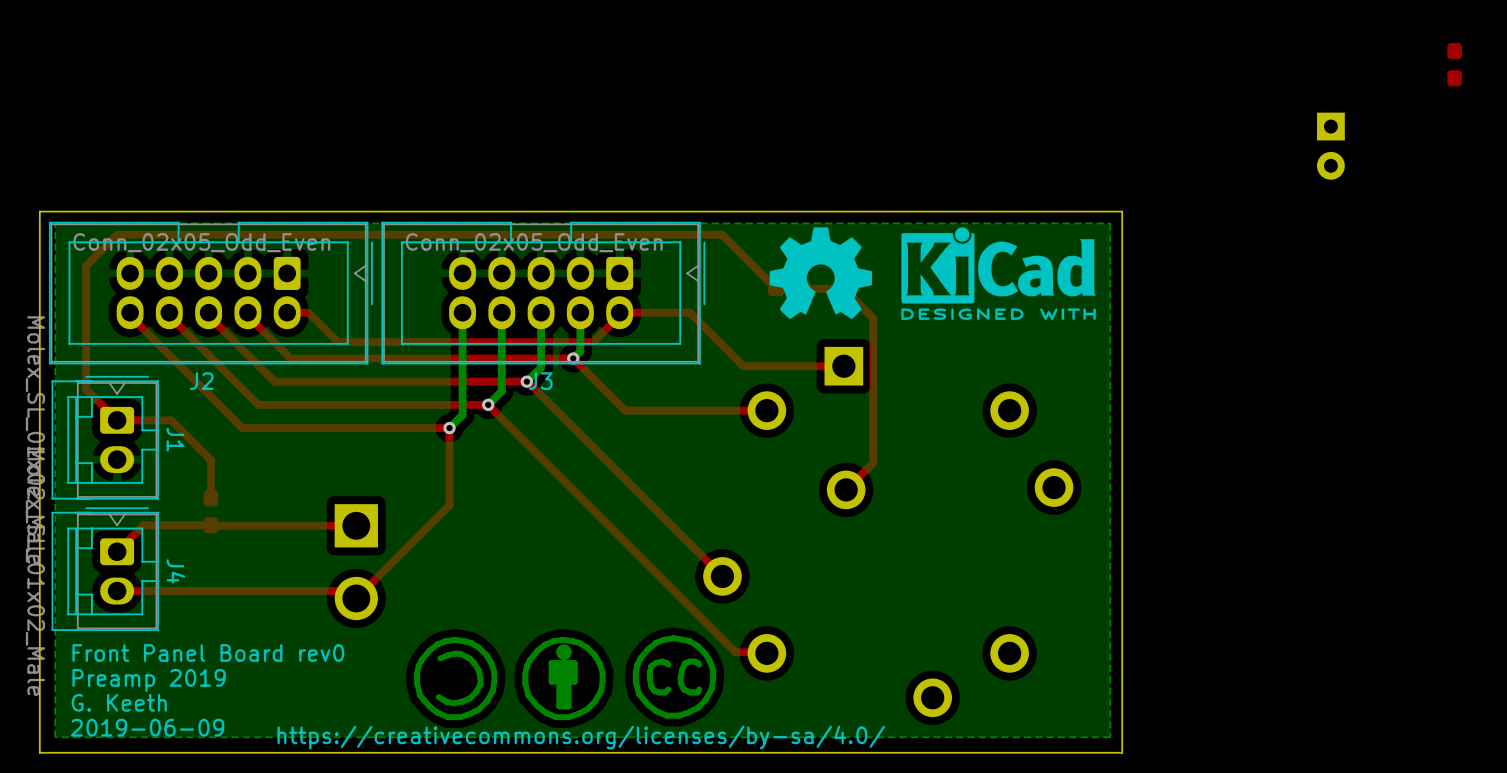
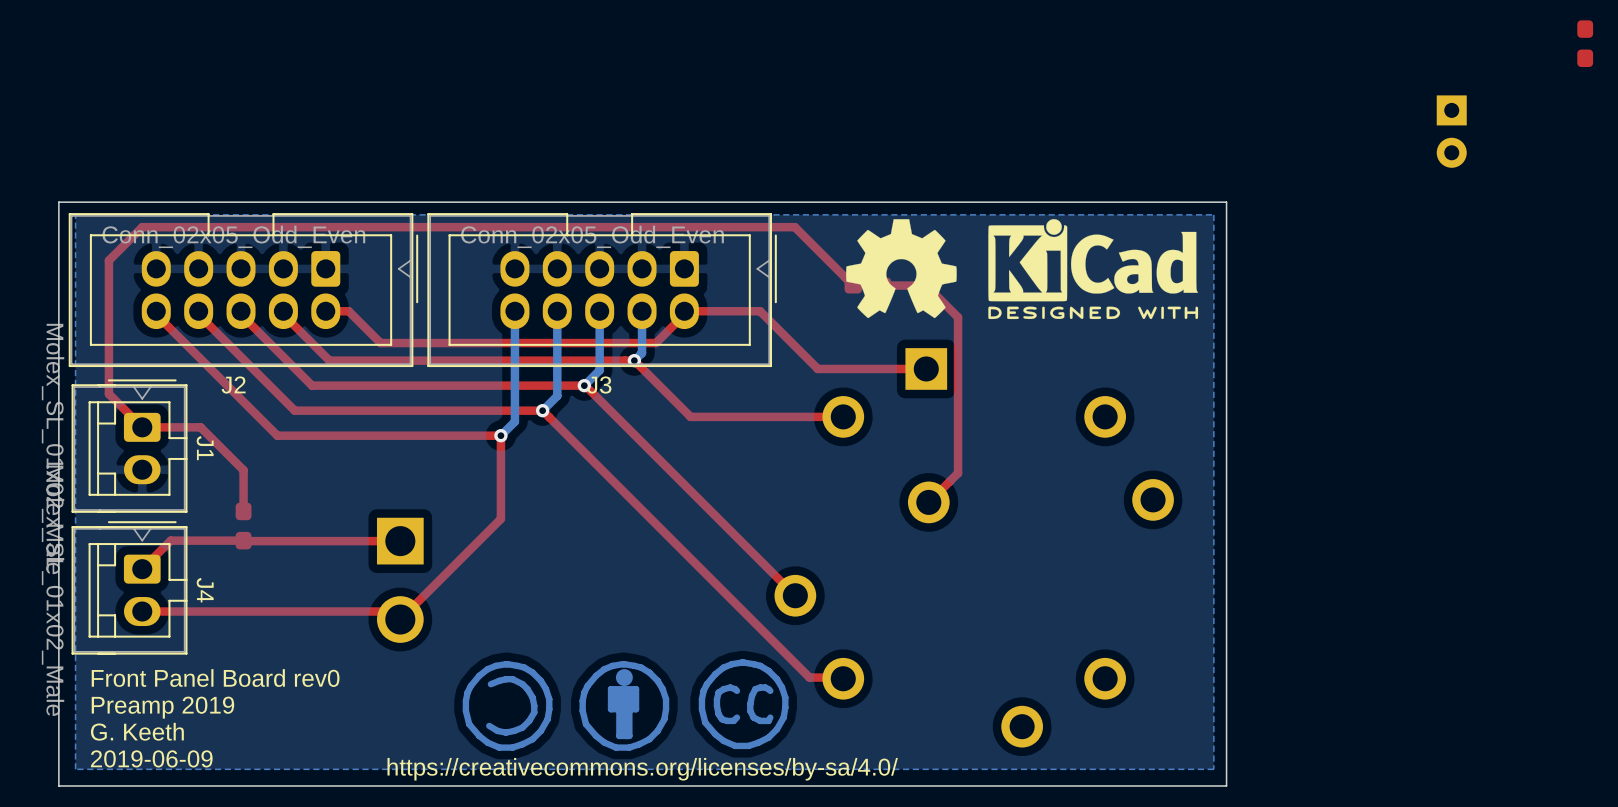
J1 footprint: [51, 375, 160, 500] -> [71, 379, 188, 513]
J4 footprint: [51, 507, 160, 632] -> [71, 521, 188, 655]

